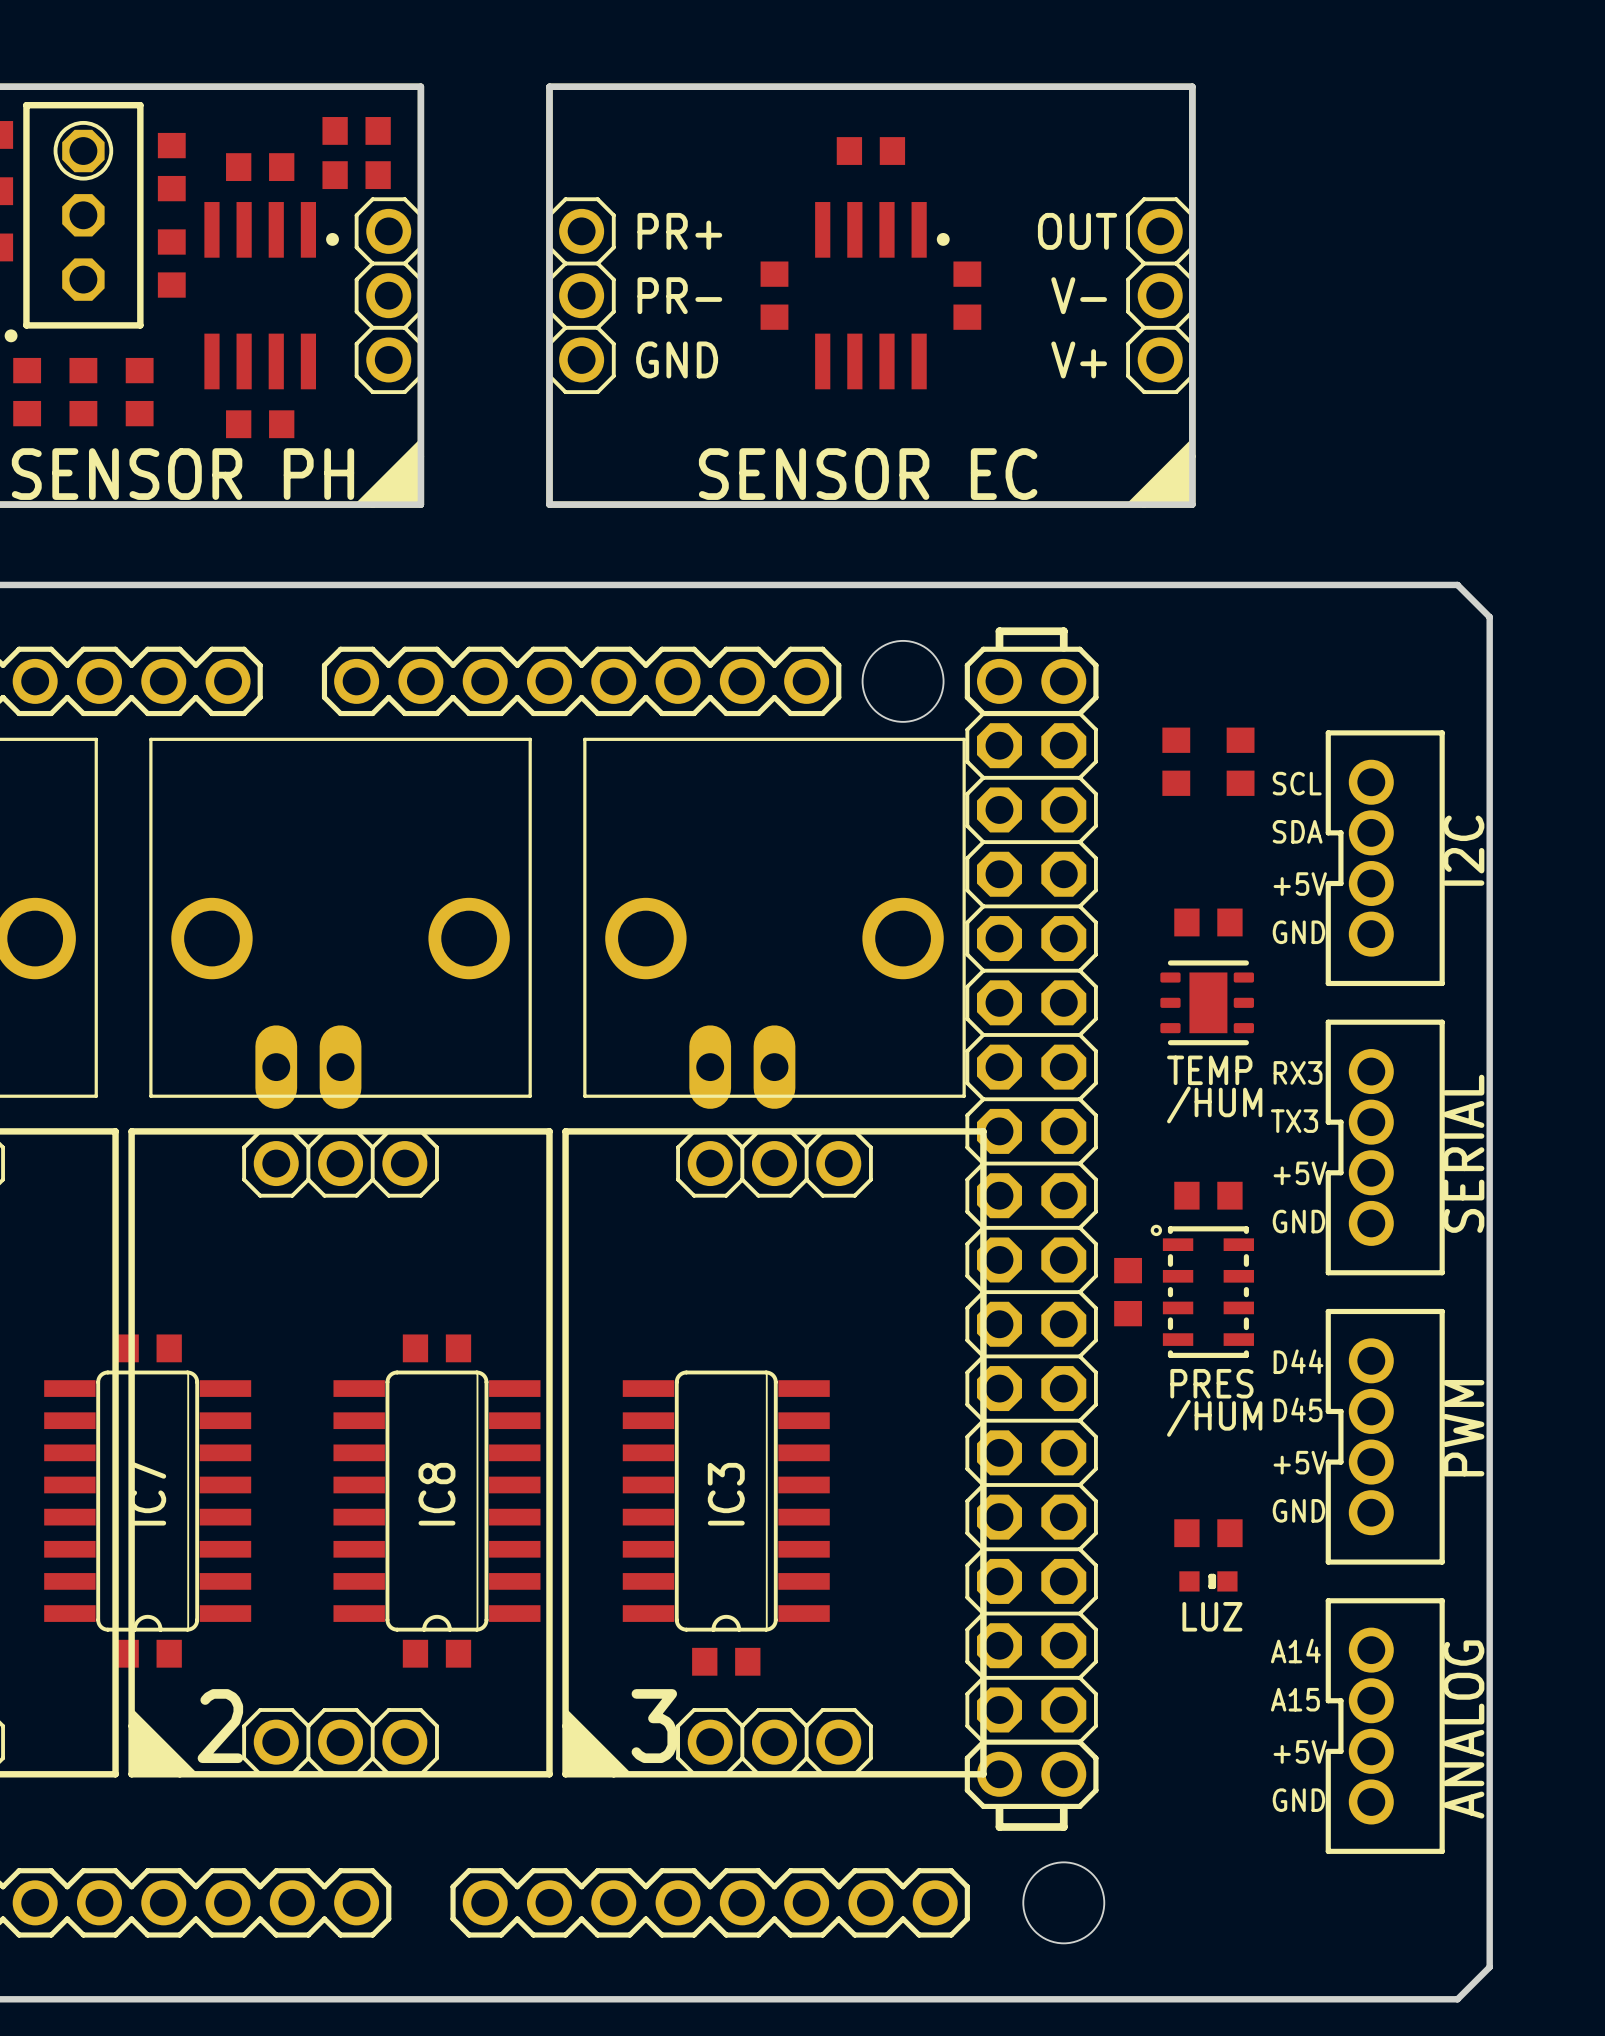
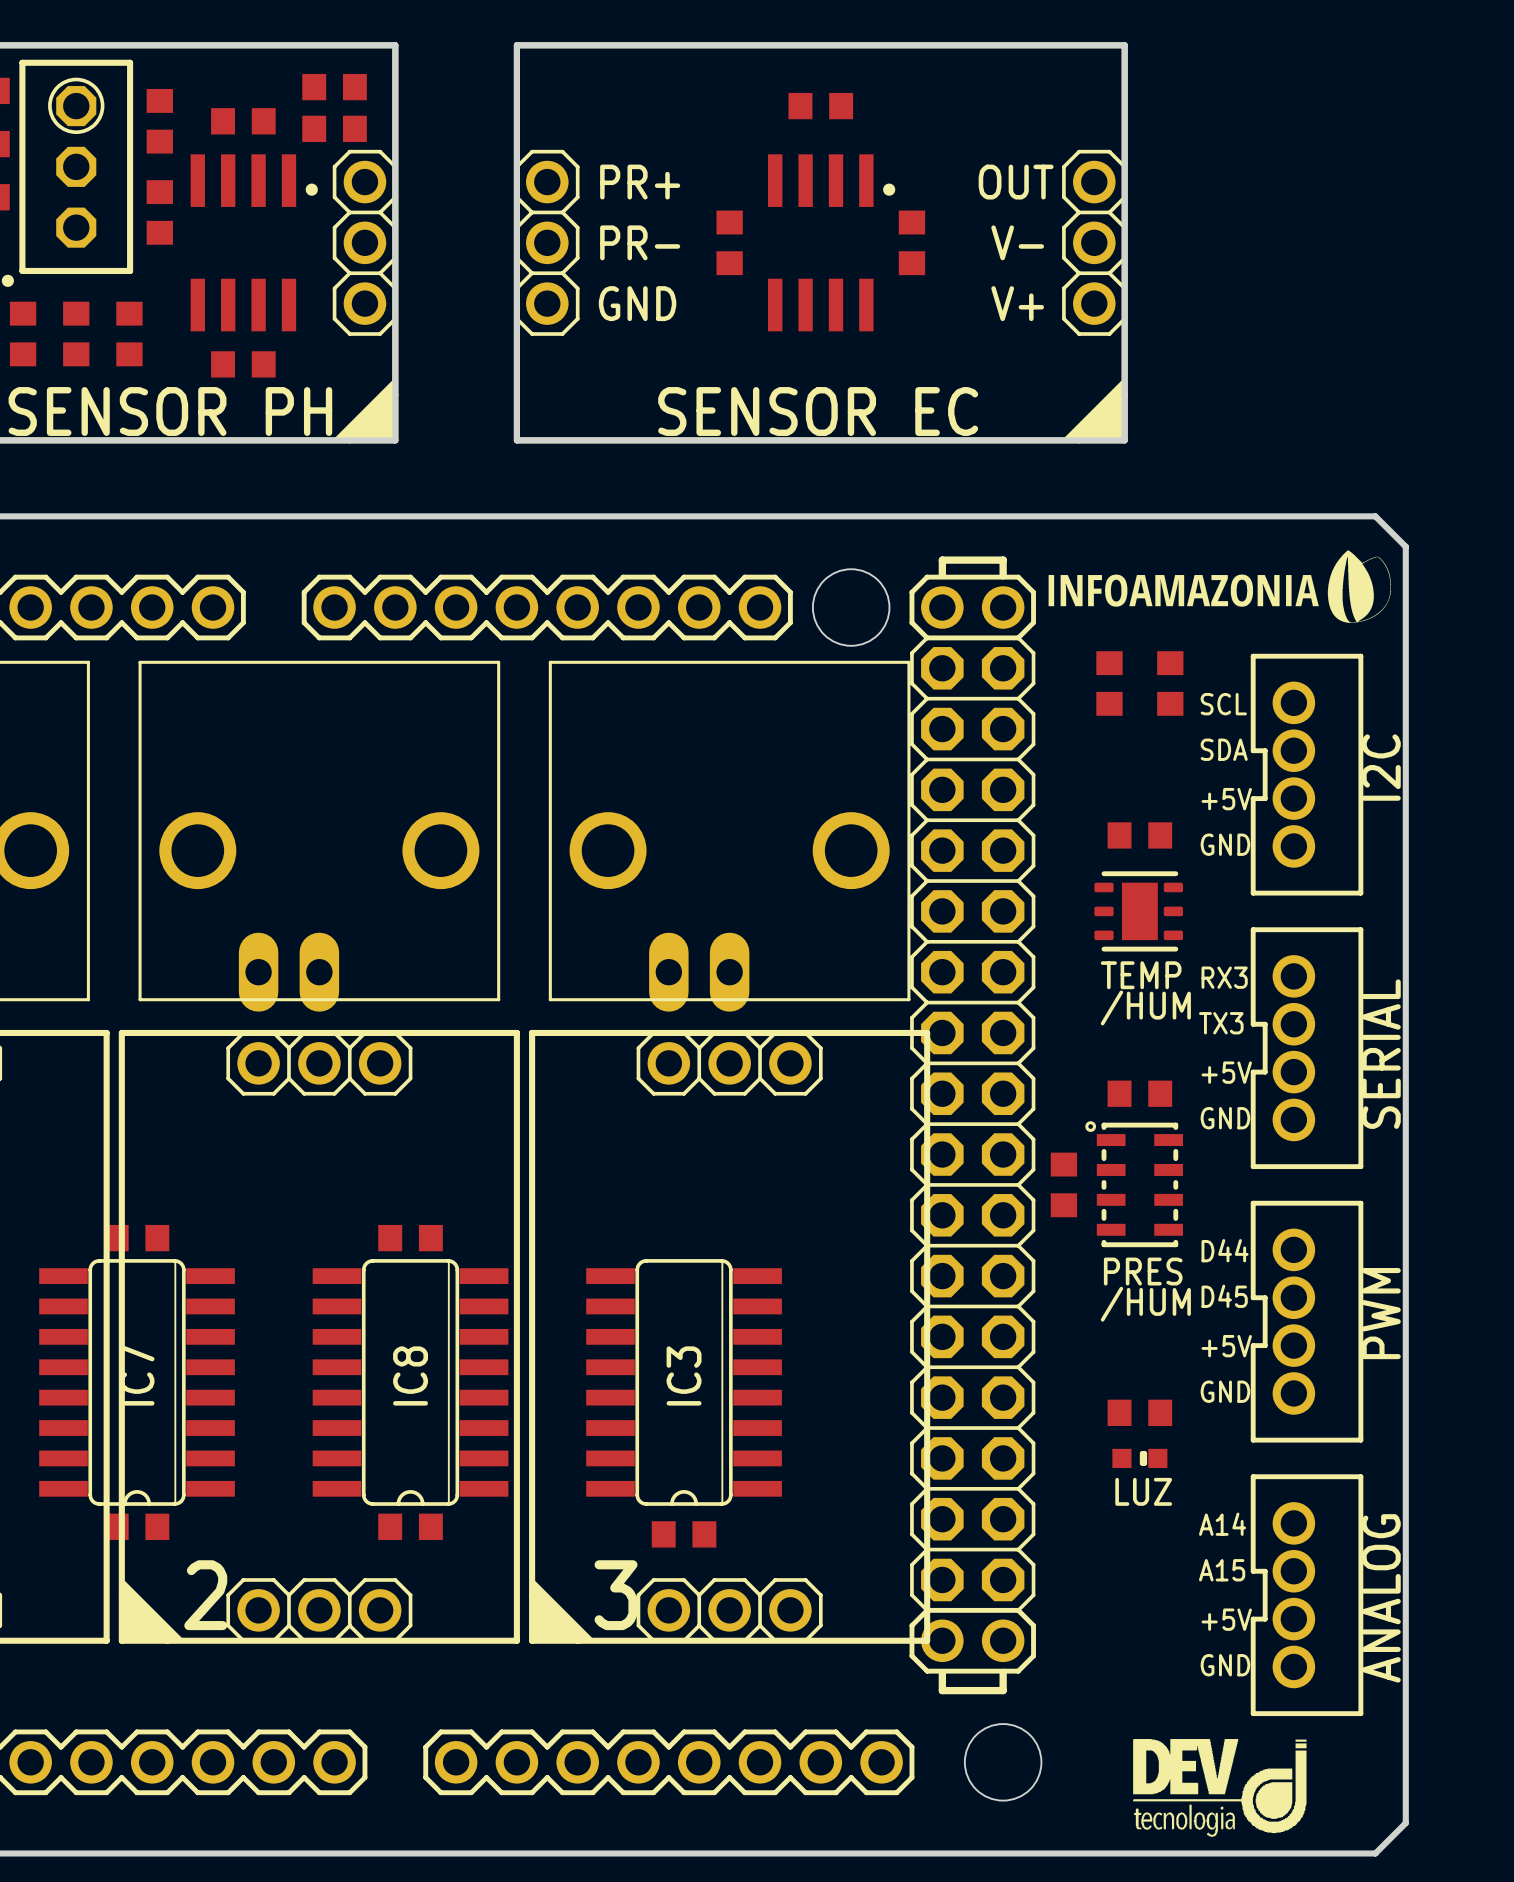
drawing: none -> [1048, 550, 1391, 623]
drawing: none -> [1133, 1739, 1307, 1837]

